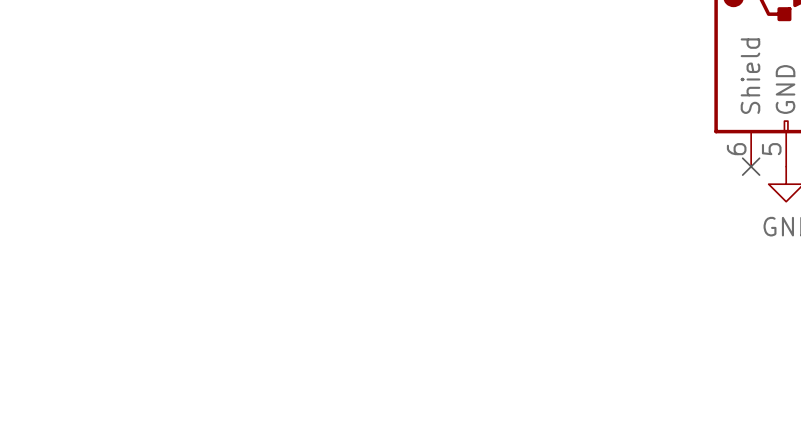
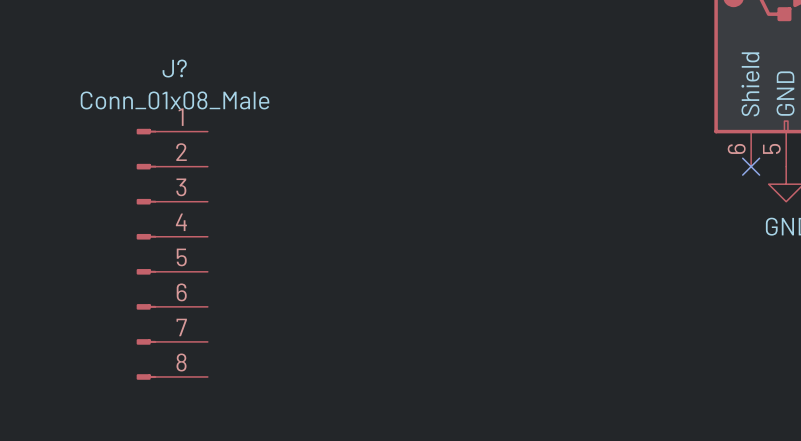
J?: none -> Conn_01x08_Male (172, 254)

